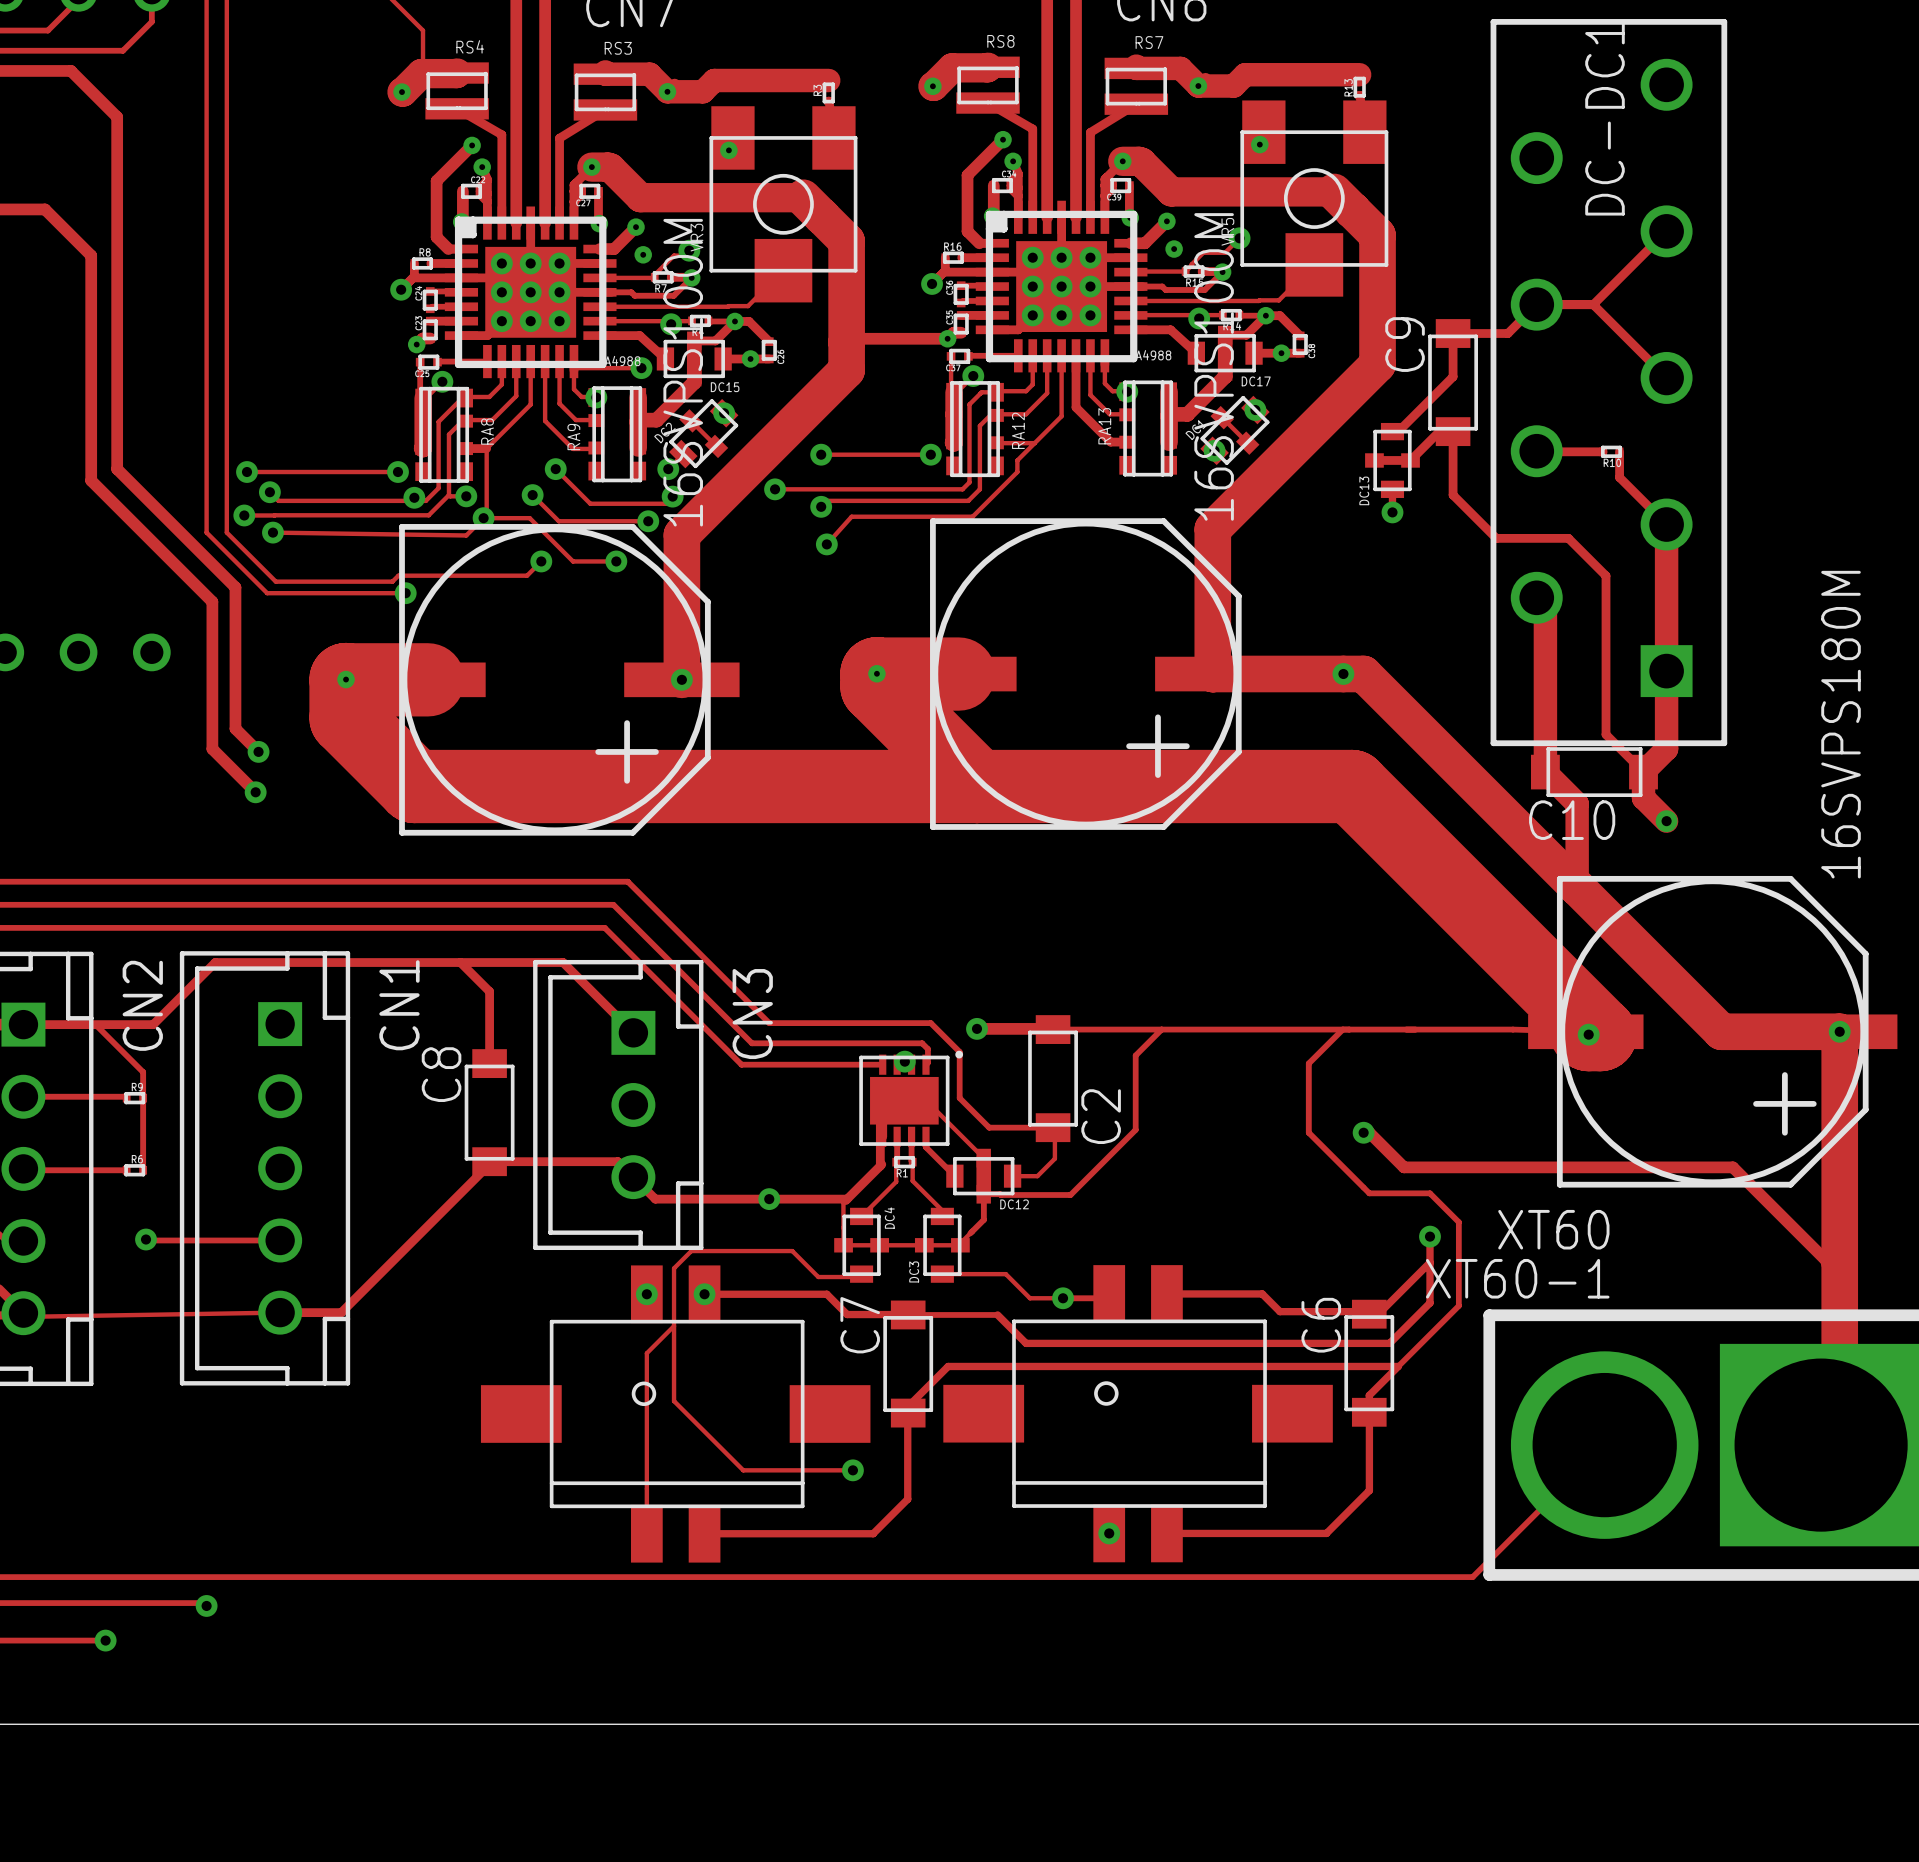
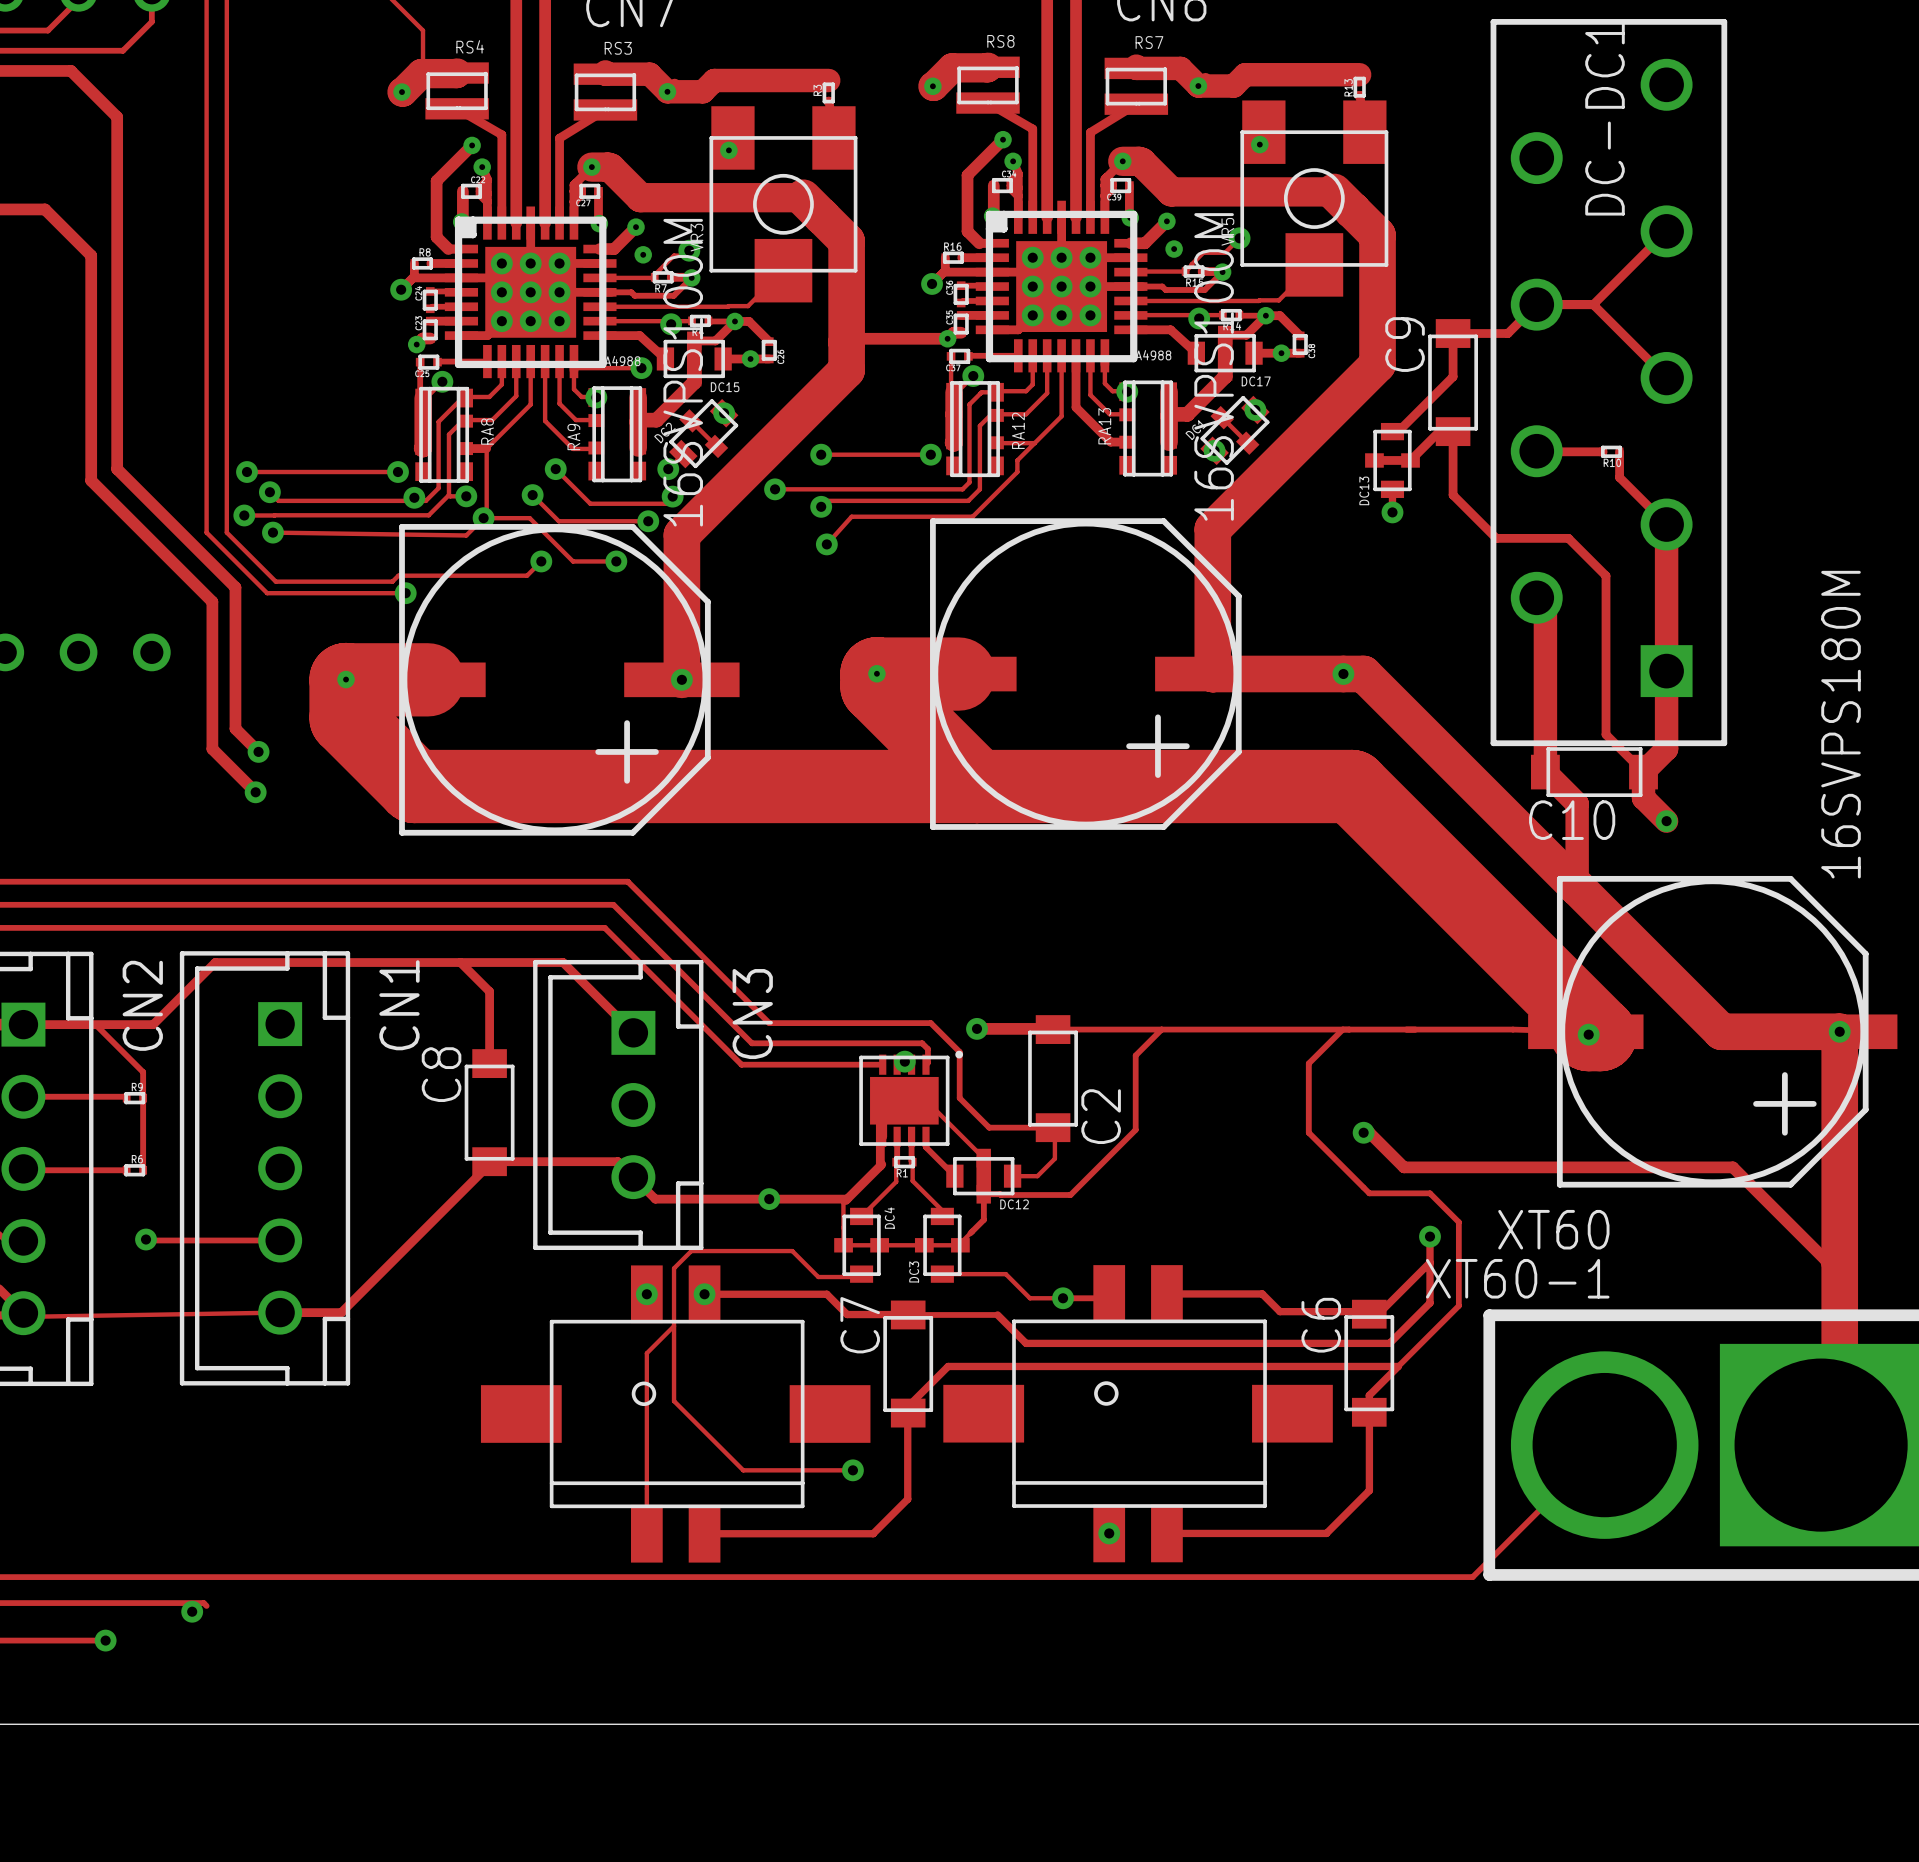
via position: (206, 1605) -> (192, 1611)

